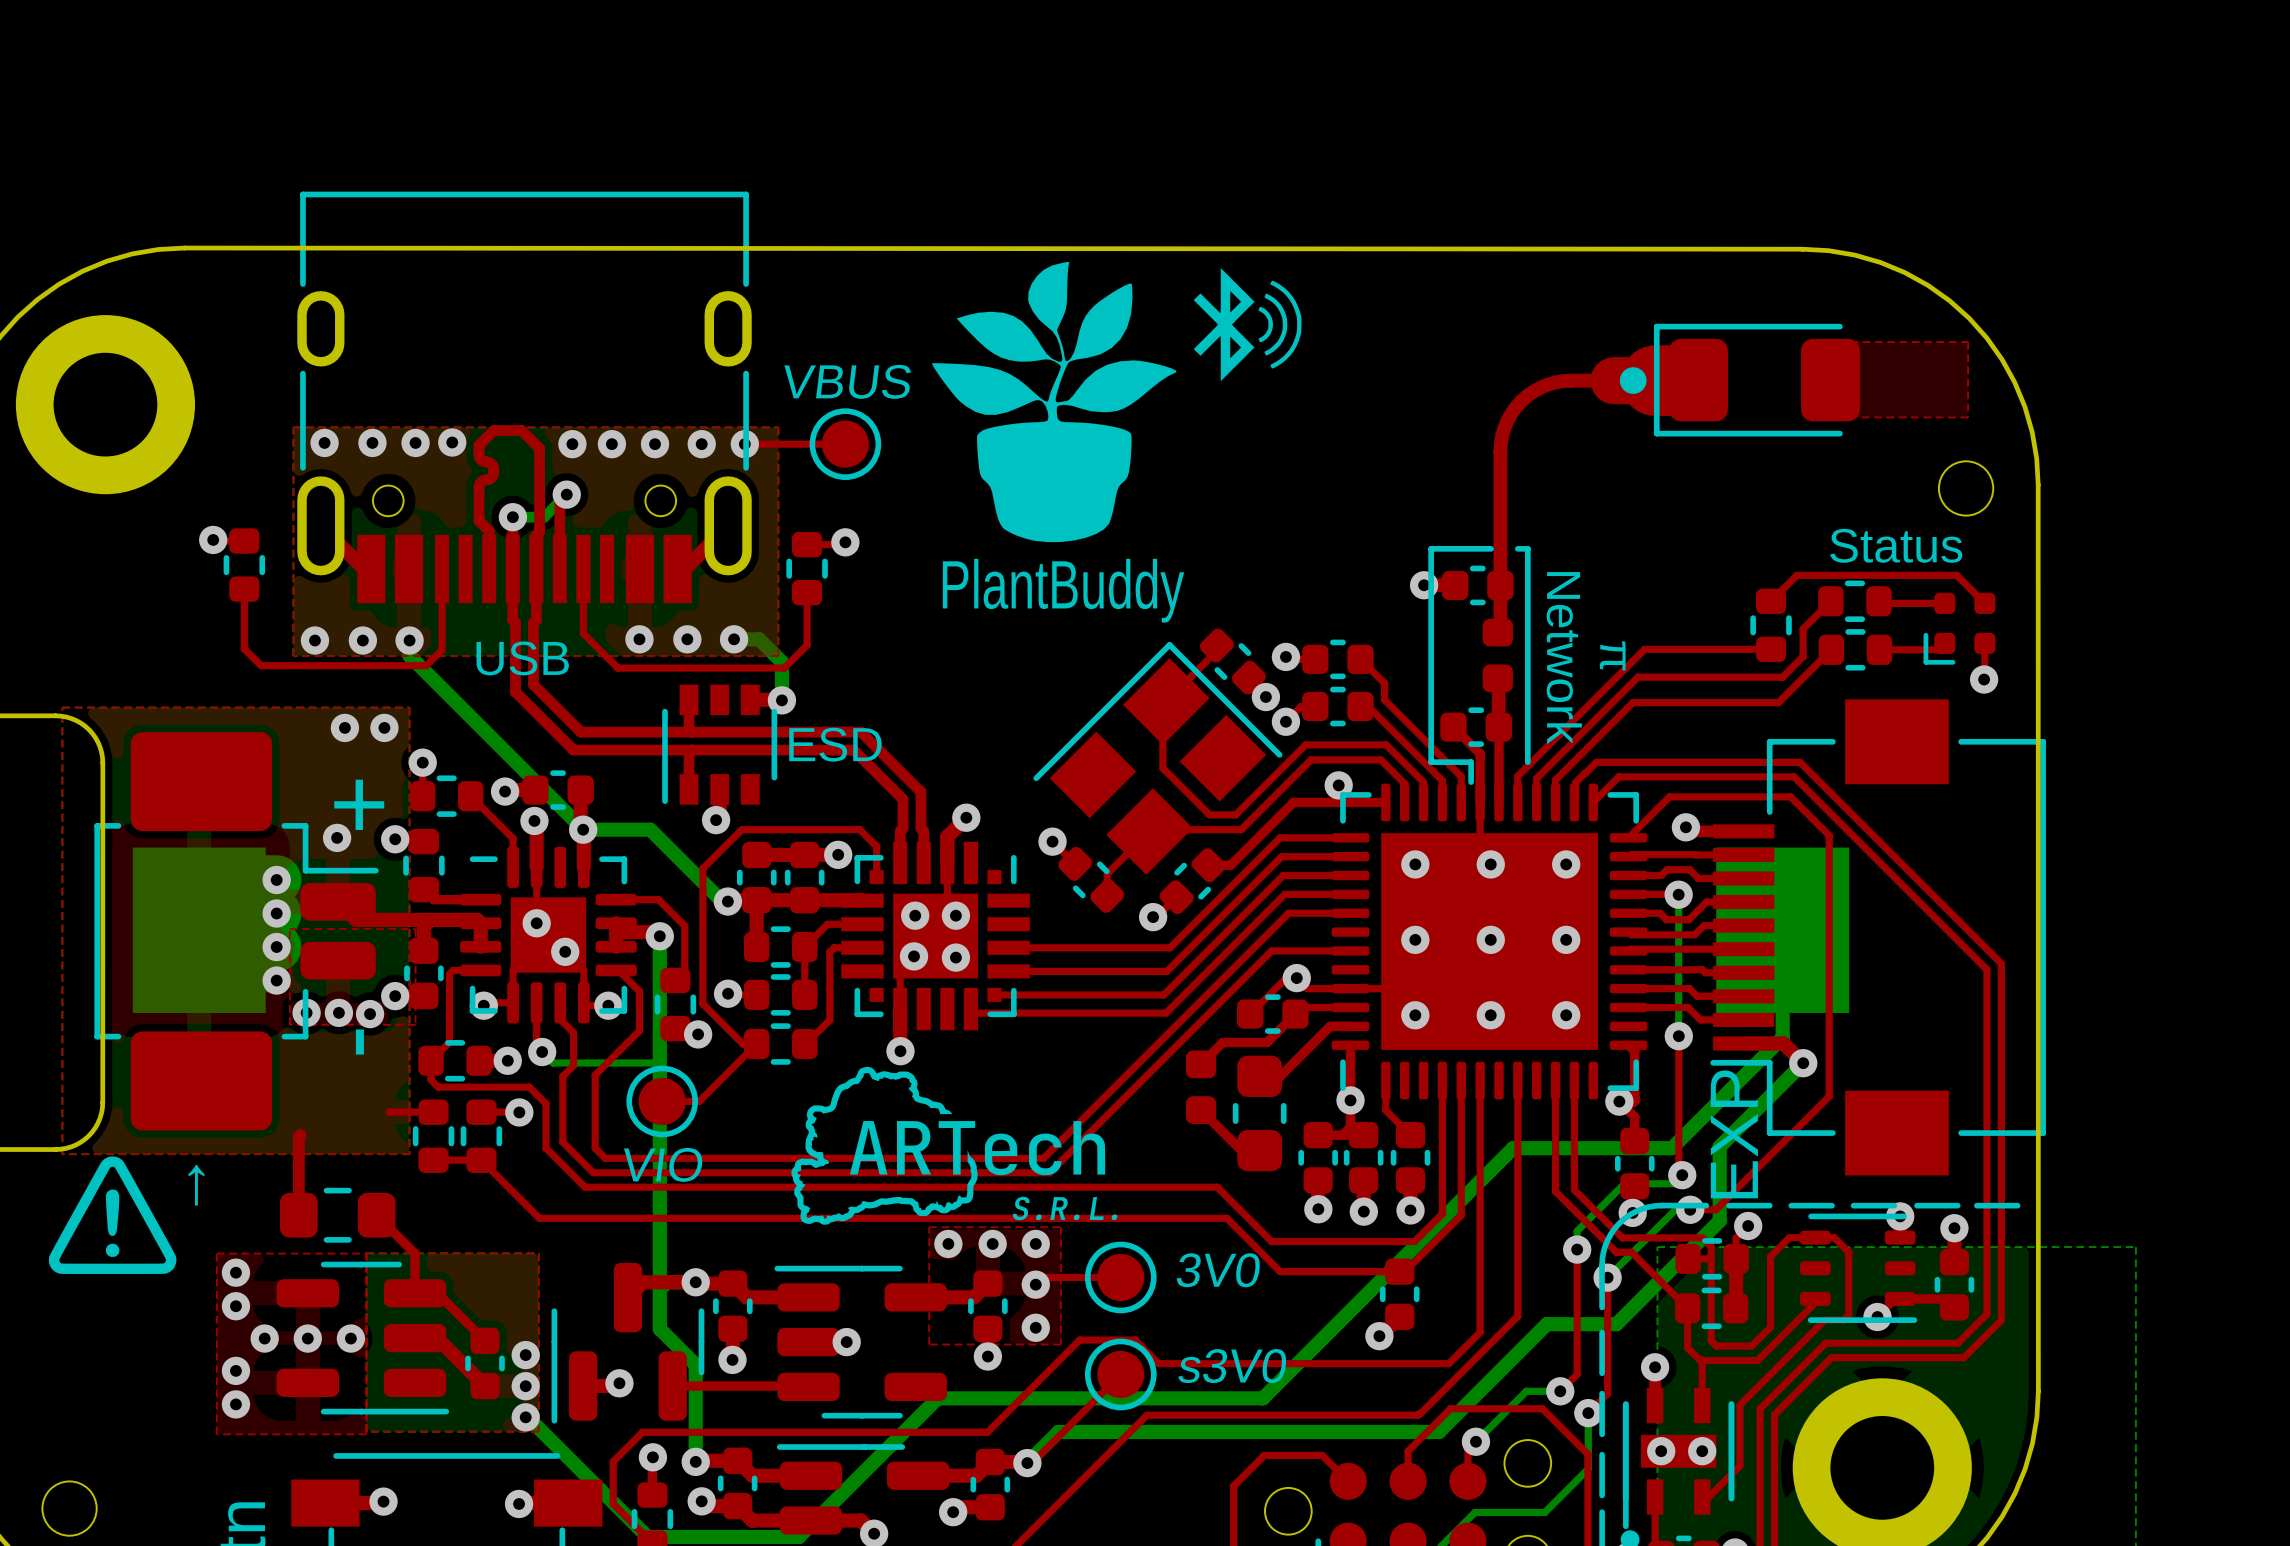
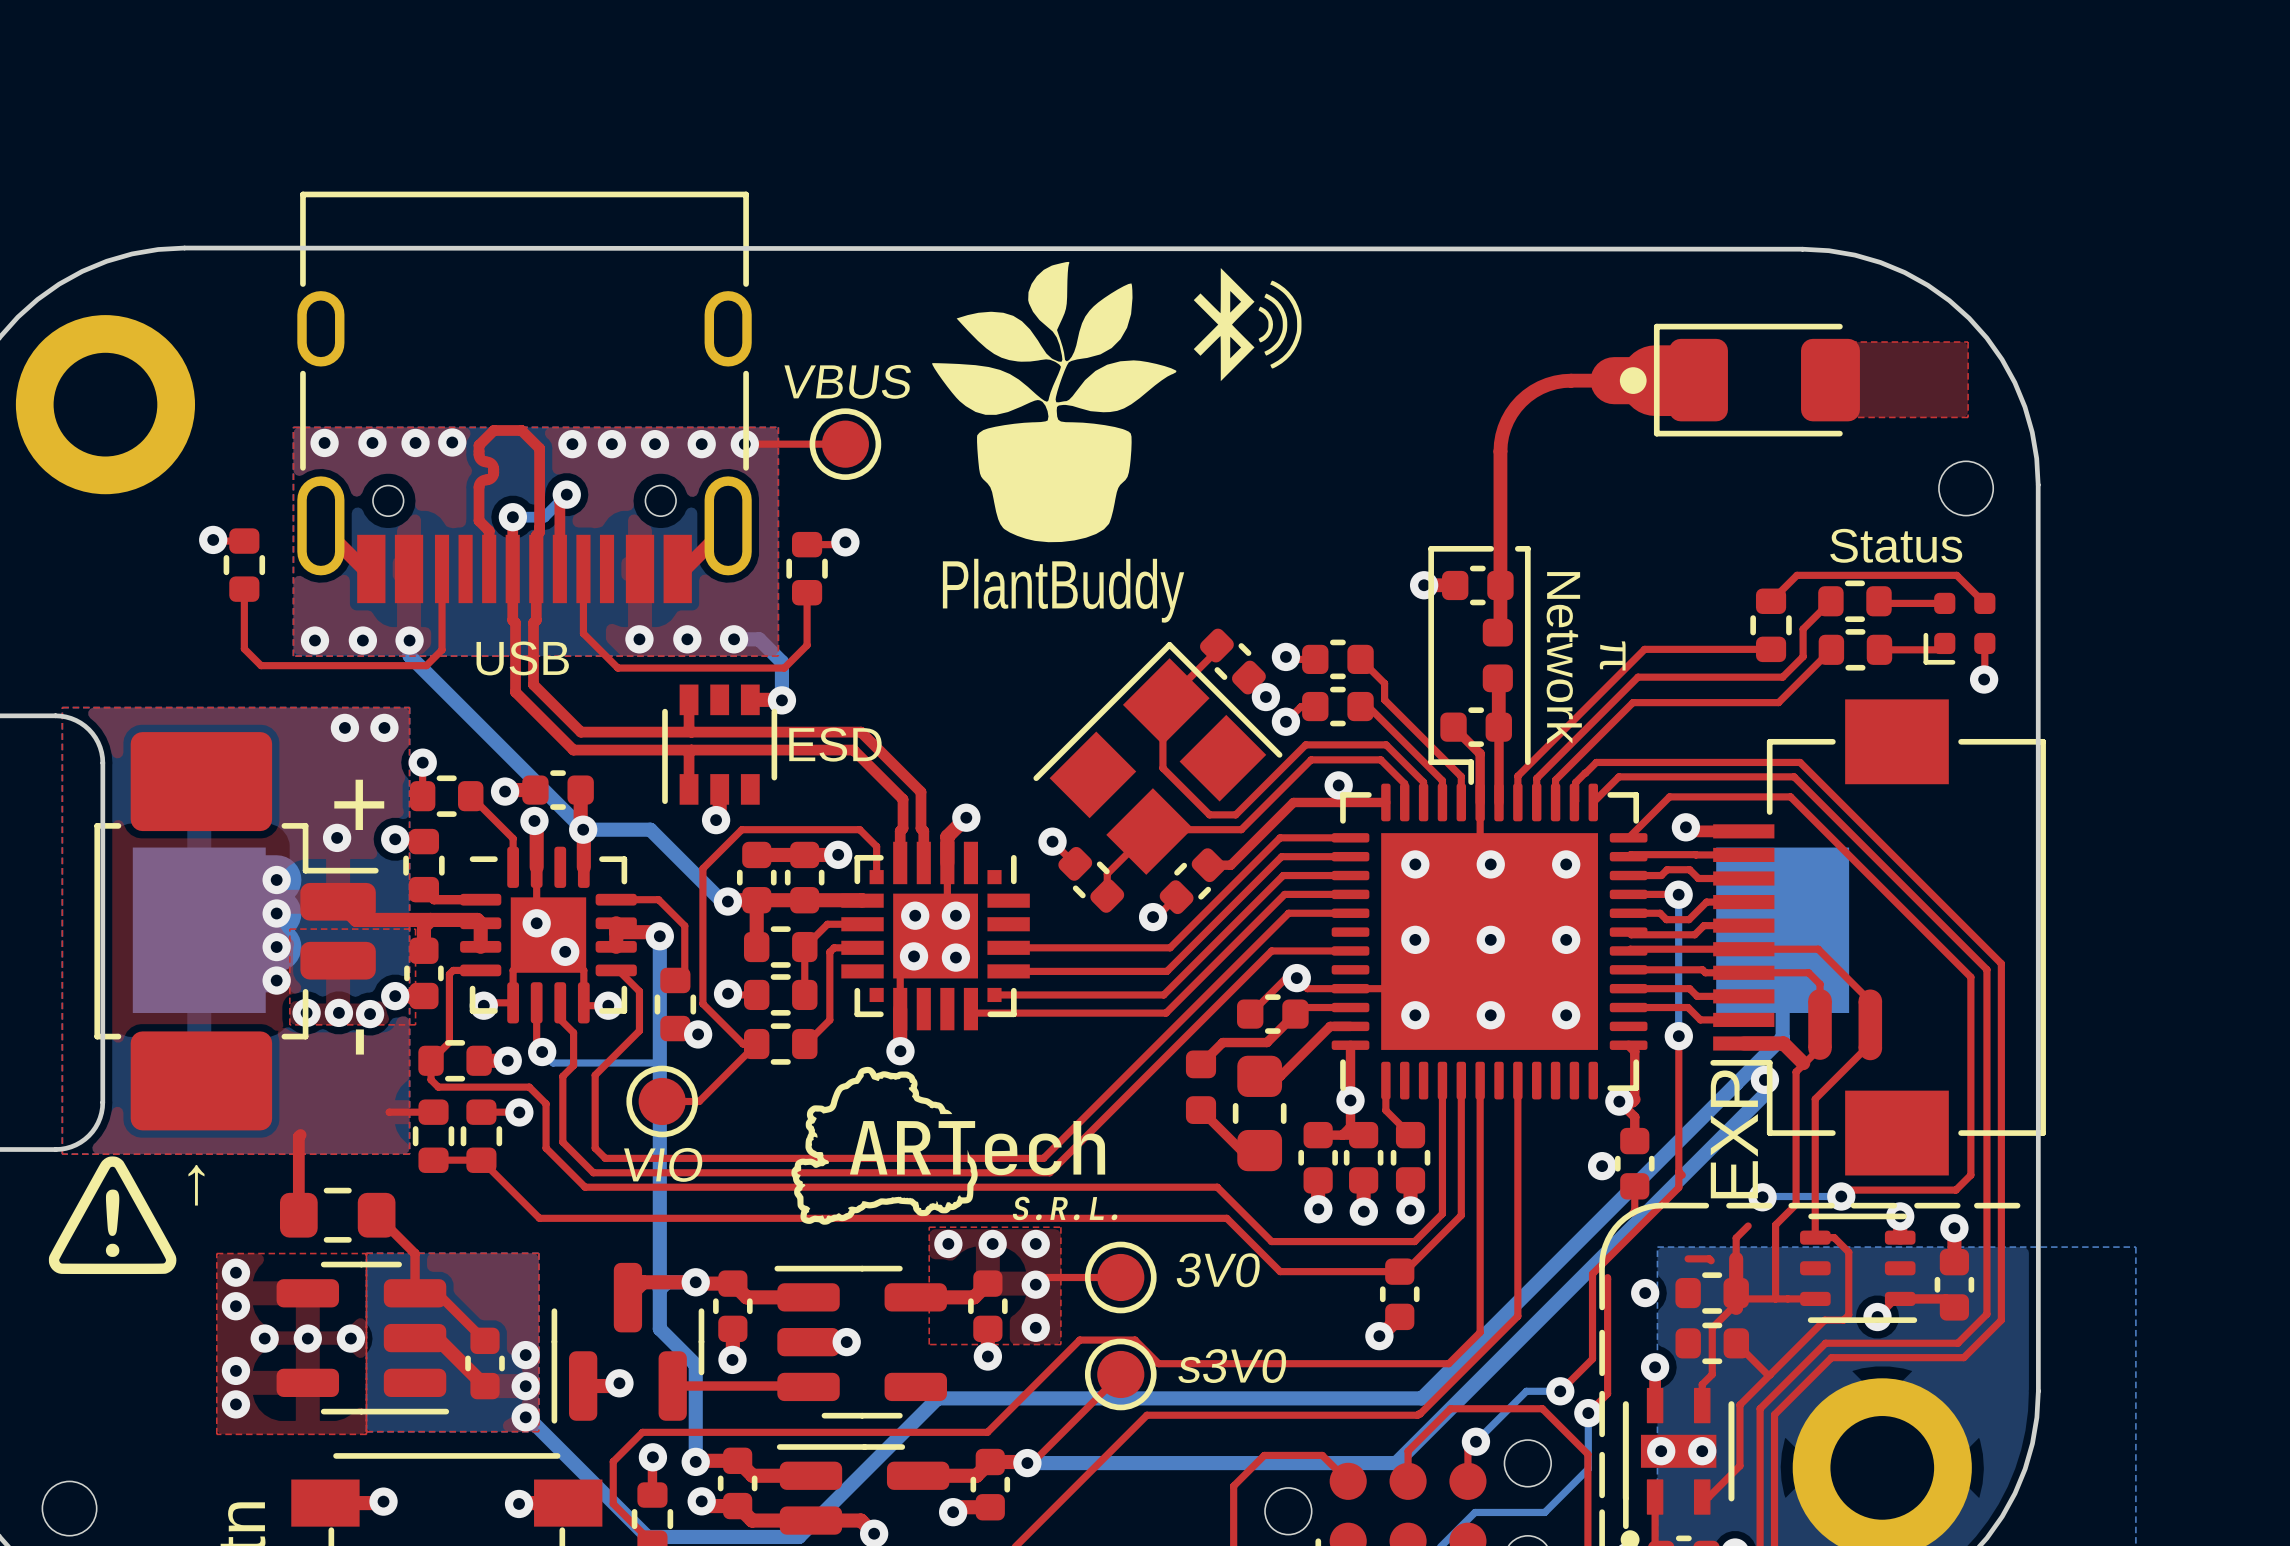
top track: (1829, 835) (1829, 1096) (1715, 1209) (1690, 1209) -> (1829, 835) (1970, 977) (1970, 1175) (1955, 1190) (1847, 1190) (1841, 1196)
top track: none -> (1743, 949) (1818, 949) (1870, 1001)
top track: none -> (1743, 972) (1808, 972) (1820, 984) (1820, 1000)
part: none -> (1820, 1024)
part: none -> (1870, 1024)
top track: none -> (1820, 1048) (1796, 1072) (1796, 1204) (1775, 1224) (1775, 1298)
bottom track: (1803, 1063) (1719, 1146) (1719, 1220) (1616, 1324) (1546, 1324) (1439, 1431) (1058, 1431) (1027, 1463) -> (1764, 1079) (1764, 1094) (1396, 1463) (1027, 1463)
via position: (1803, 1063) -> (1764, 1079)
top track: (1555, 1080) (1555, 1191) (1616, 1252) (1631, 1252) (1687, 1308) (1687, 1347) (1699, 1360) (1702, 1360) (1702, 1384) -> none
top track: (1574, 1080) (1574, 1189) (1622, 1237) (1702, 1237) (1711, 1246) (1711, 1340) (1716, 1346) (1751, 1346) (1770, 1327) (1770, 1256) (1789, 1237) (1815, 1237) -> (1870, 1048) (1865, 1048) (1815, 1099) (1815, 1237)
bottom track: (1671, 1148) (1513, 1148) (1262, 1398) -> (1671, 1148) (1421, 1398) (1262, 1398)
via: none -> (1602, 1166)
bottom track: (1682, 1175) (1673, 1183) (1624, 1183) (1577, 1231) (1577, 1249) -> none
via: (1682, 1175) -> none
bottom track: none -> (1841, 1196) (1762, 1197)
via: none -> (1841, 1196)
bottom track: (1690, 1209) (1675, 1209) (1607, 1277) -> none
via: (1690, 1209) -> none
via: (1632, 1212) -> none
via position: (1748, 1226) -> (1762, 1197)
top track: (1577, 1249) (1577, 1374) -> (1678, 1171) (1678, 1187) (1592, 1273) (1592, 1359) (1577, 1374)
via: (1577, 1249) -> none
part position: (1712, 1258) -> (1712, 1343)
via: (1607, 1277) -> none
via: none -> (1645, 1293)
top track: (1815, 1298) (1815, 1302) (1757, 1360) (1702, 1360) -> (1815, 1298) (1741, 1298) (1712, 1327) (1712, 1374) (1702, 1384)
part position: (1711, 1308) -> (1712, 1293)
top track: none -> (1736, 1343) (1767, 1374) (1770, 1374)

